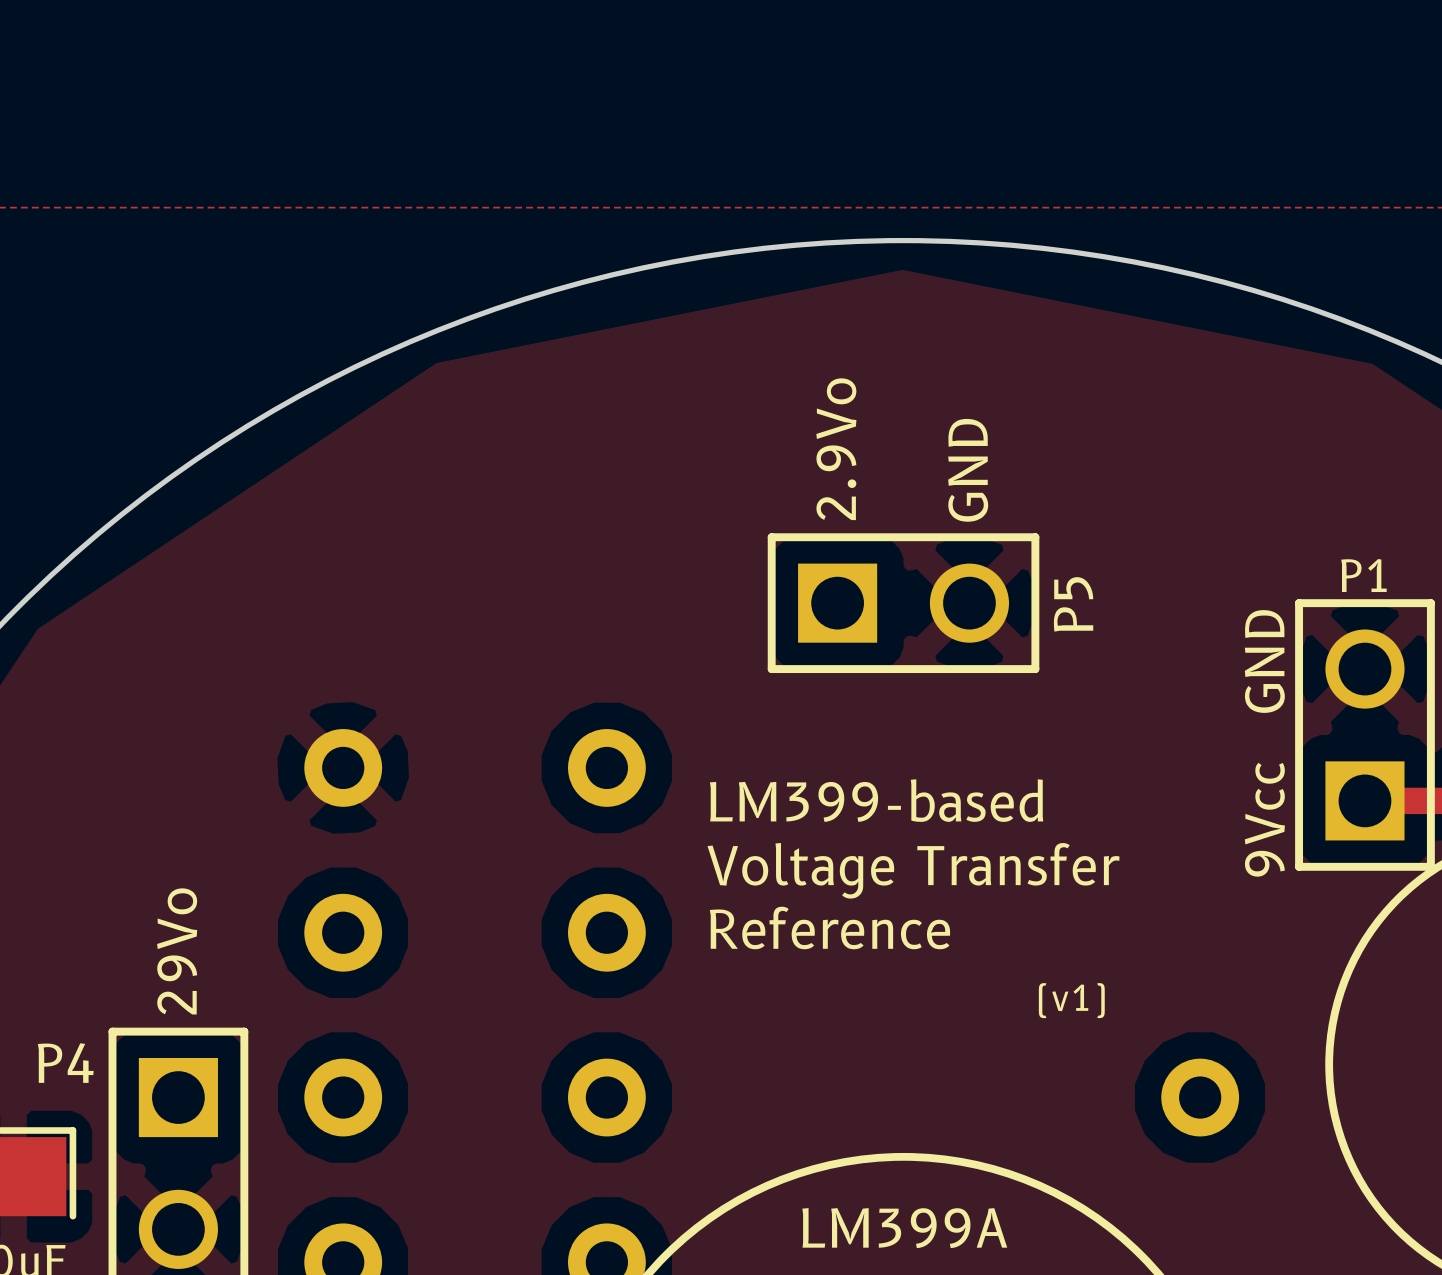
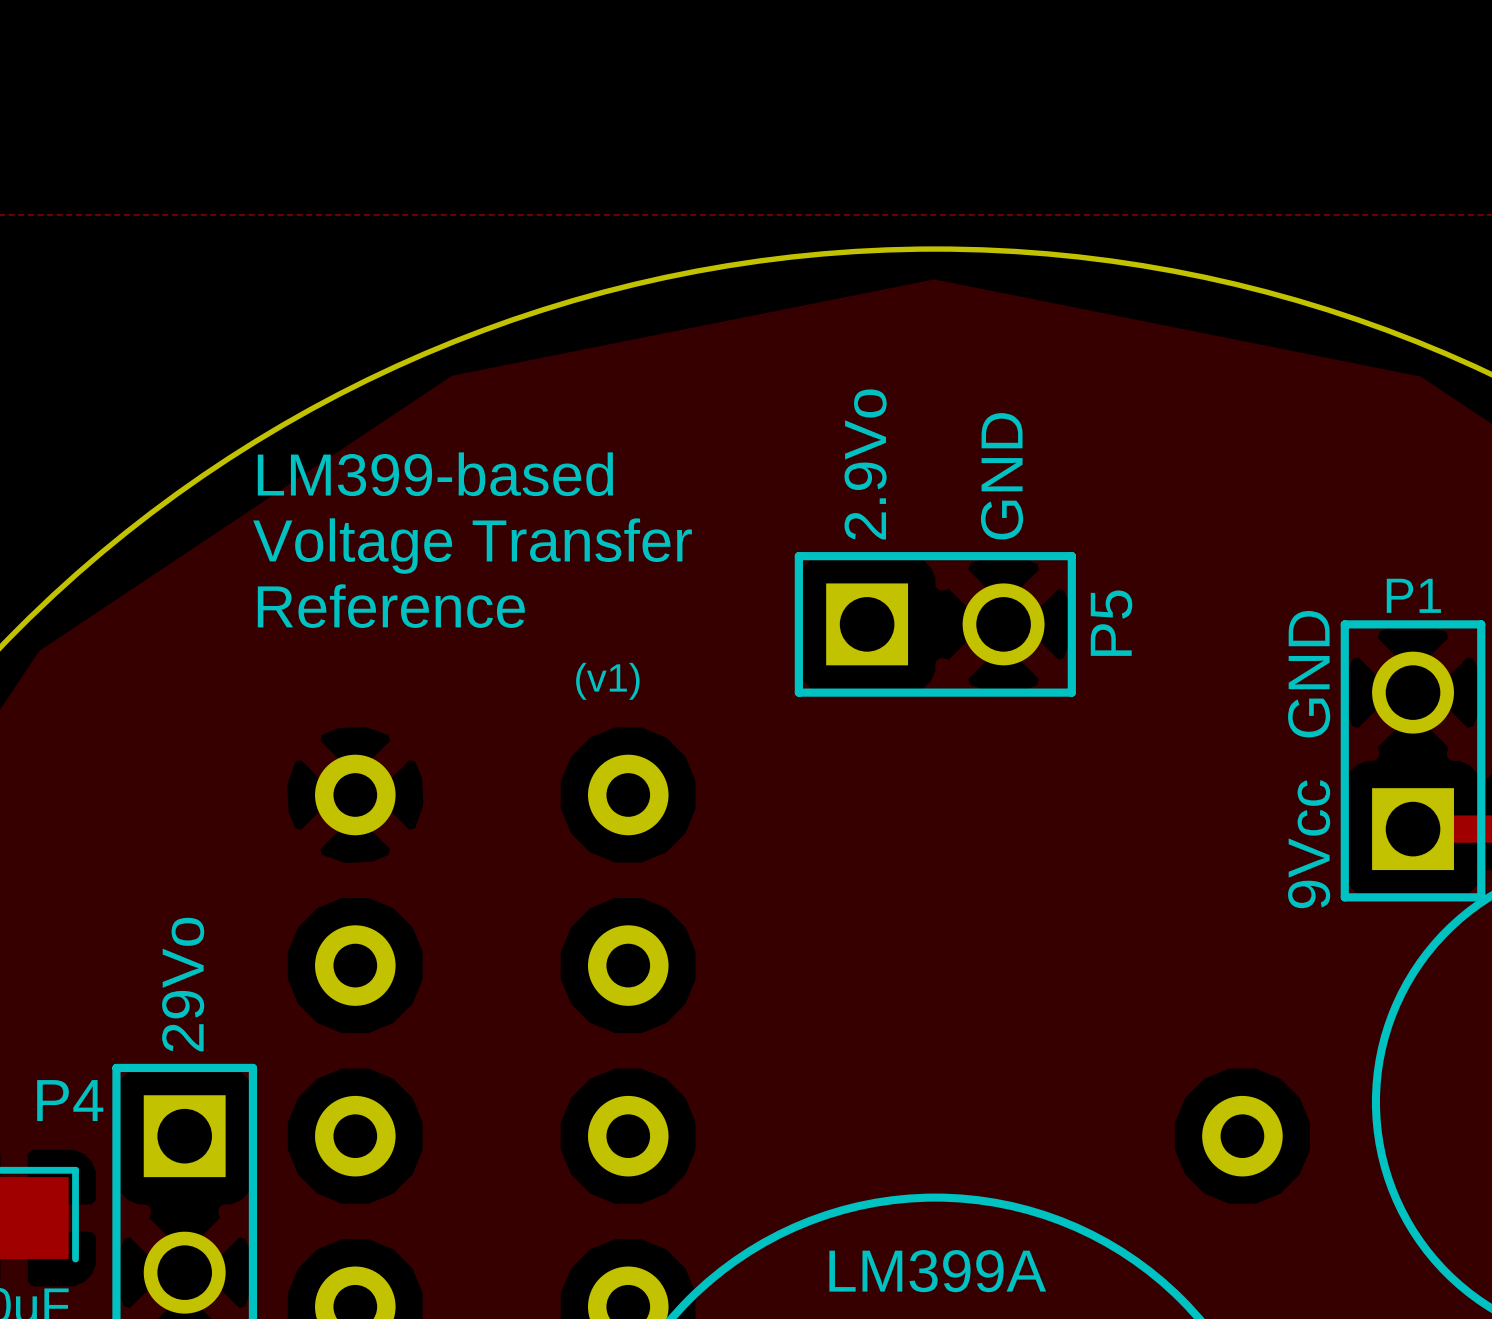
text position: LM399-based (876, 800) -> LM399-based (435, 474)
text position: Voltage Transfer (913, 870) -> Voltage Transfer (472, 546)
text position: Reference (829, 927) -> Reference (391, 606)
text position: (v1) (1071, 1000) -> (v1) (607, 681)

